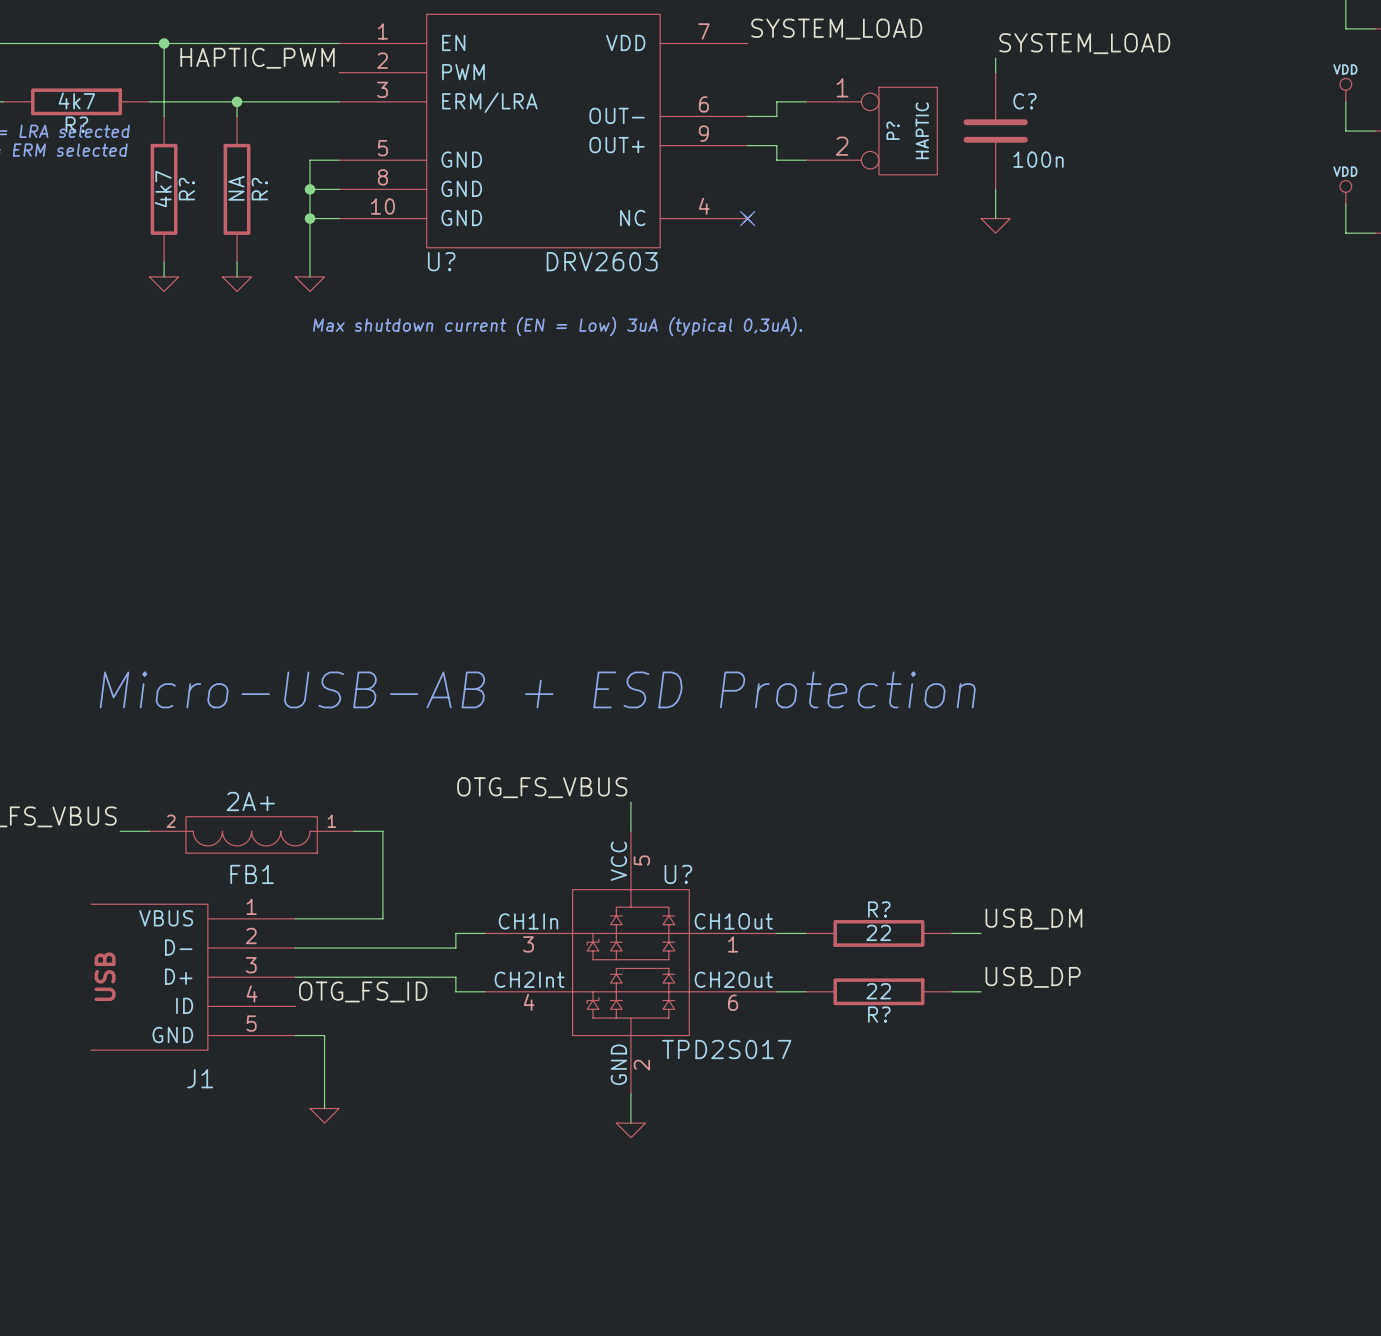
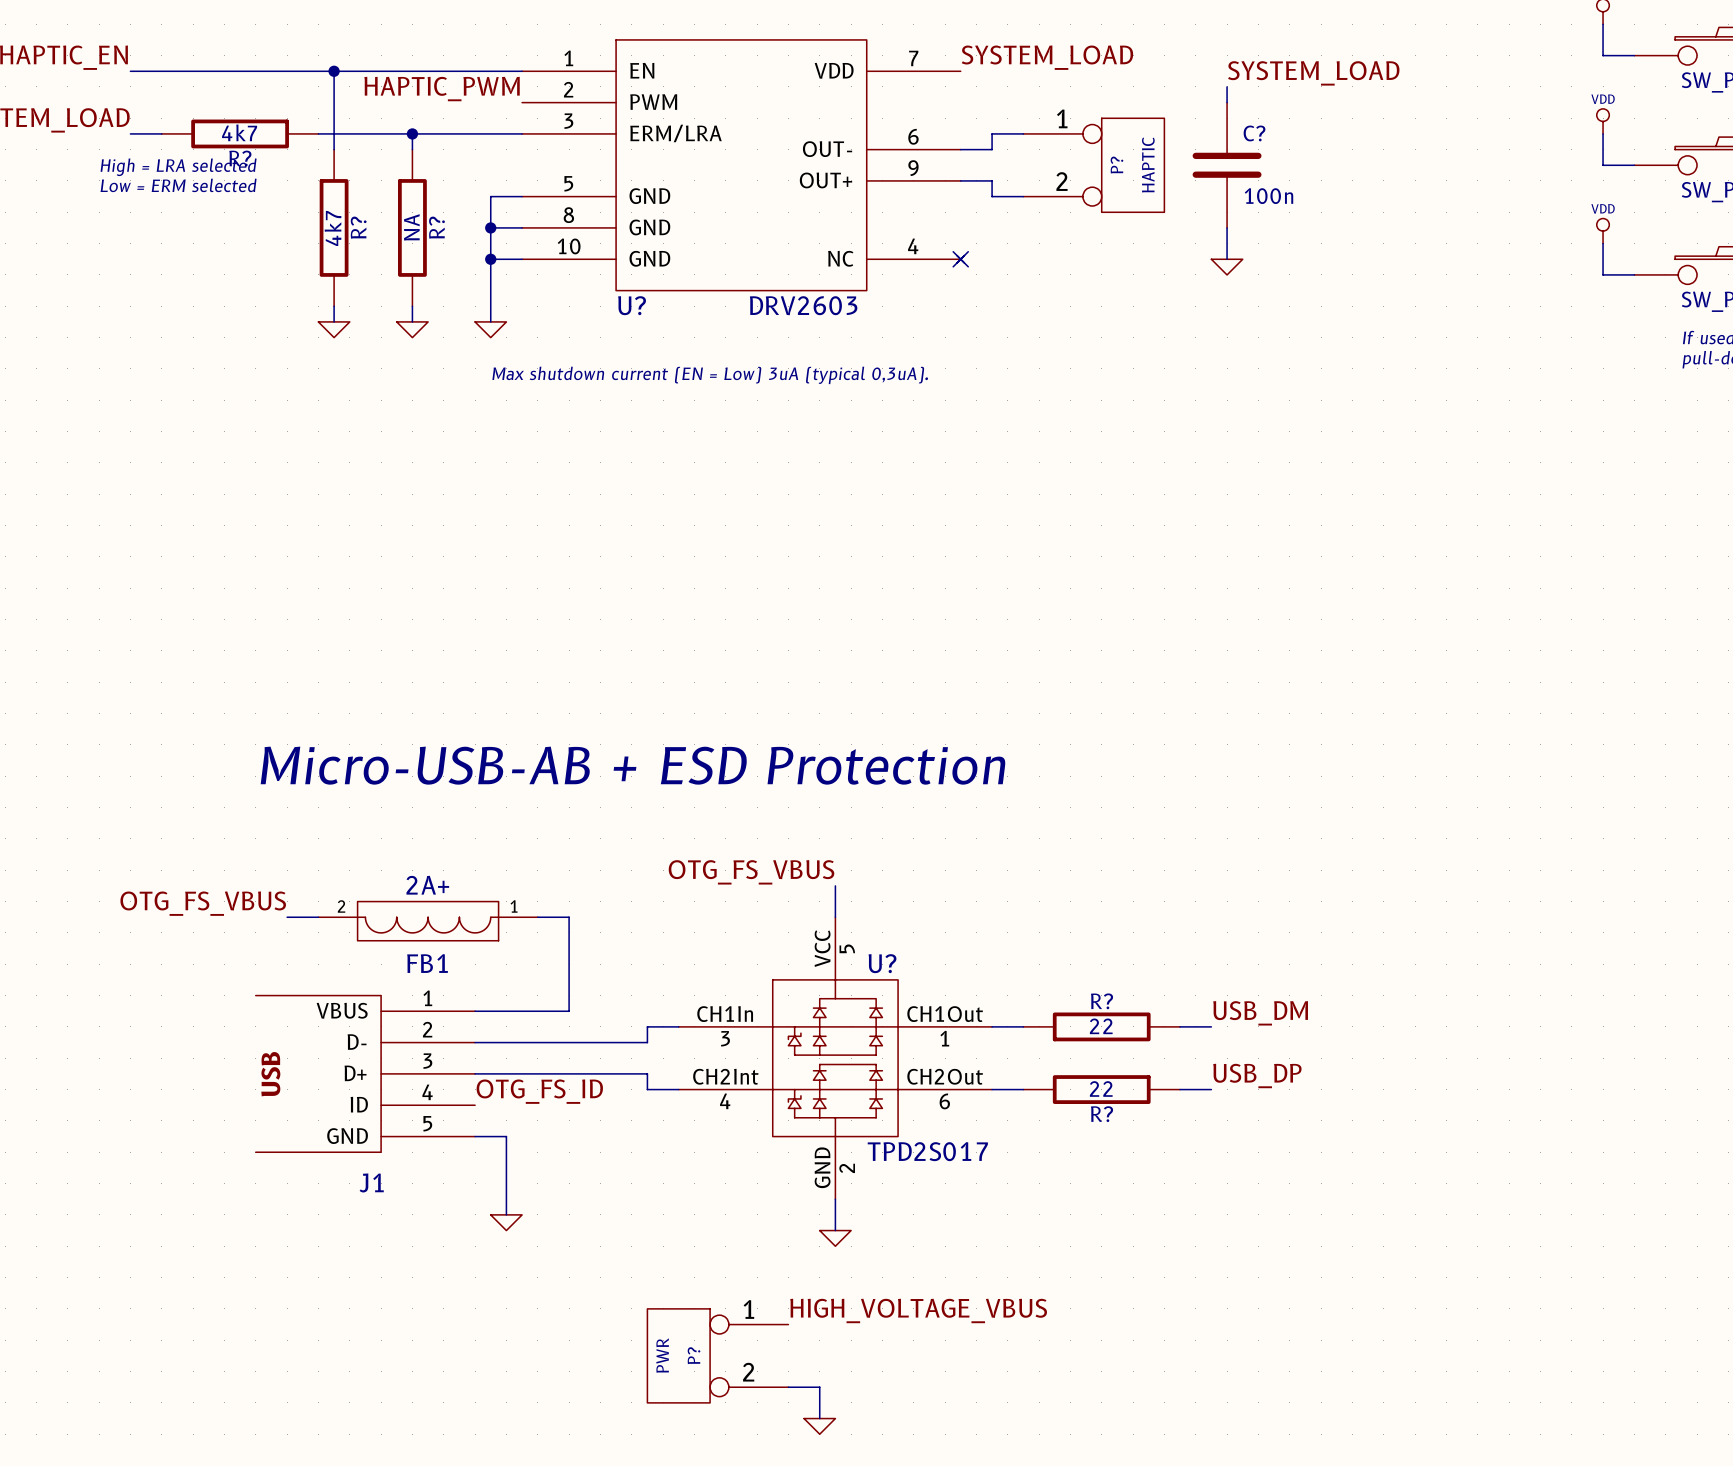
label: none -> HIGH_VOLTAGE_VBUS (918, 1310)
P?: none -> PWR (717, 1355)
wire: none -> (788, 1387) (819, 1387) (819, 1418)
power symbol: none -> (819, 1426)

